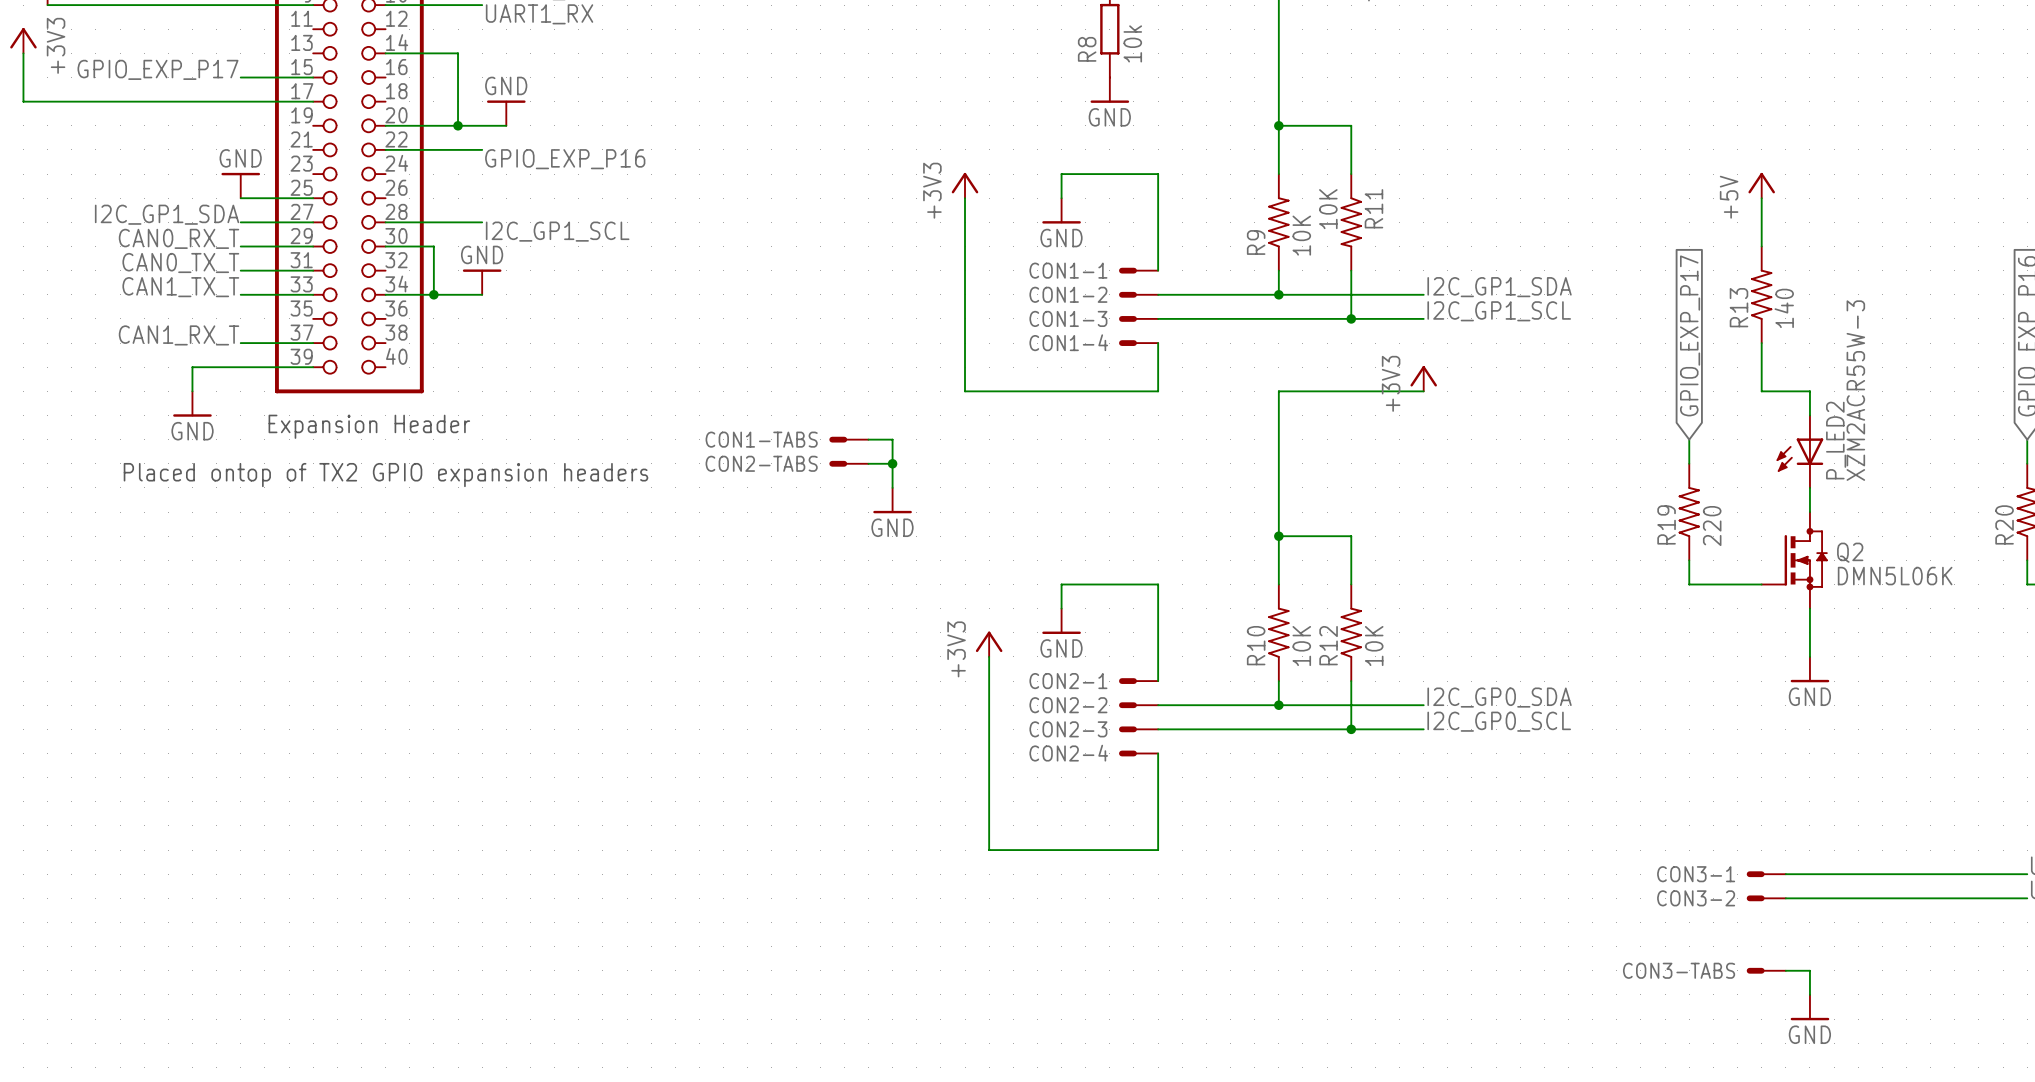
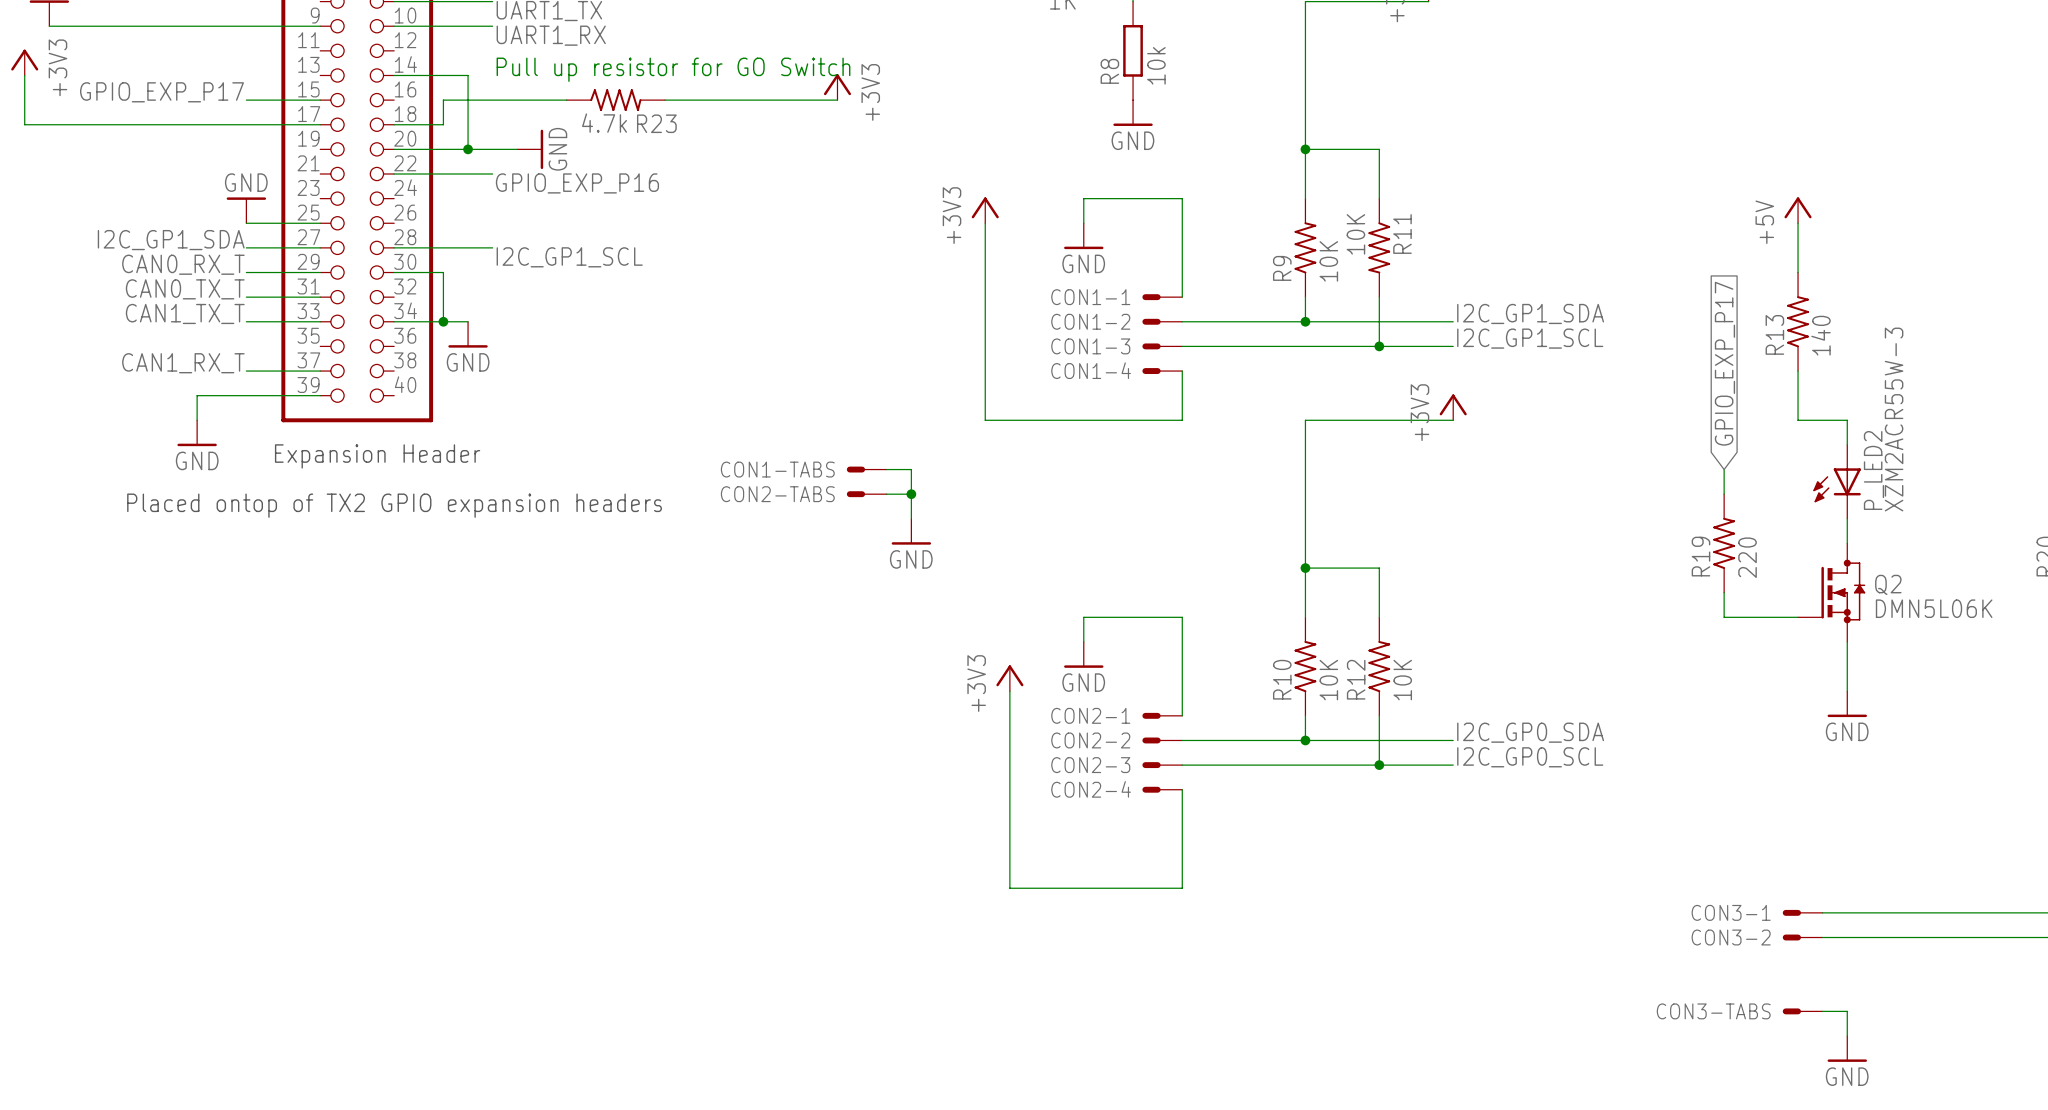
text: none -> Pull up resistor for GO Switch (673, 69)
power symbol: none -> +3V3 (837, 87)
wire: none -> (566, 100) (443, 100) (443, 124) (394, 124)
R23: none -> 4.7k (615, 100)
wire: none -> (665, 100) (837, 100)
power symbol rotation: 0° (506, 101) -> 90° clockwise (541, 149)
power symbol rotation: 0° (482, 270) -> 180° (468, 346)
power symbol position: GND (482, 282) -> GND (468, 334)
wire: (458, 294) (482, 294) -> none

